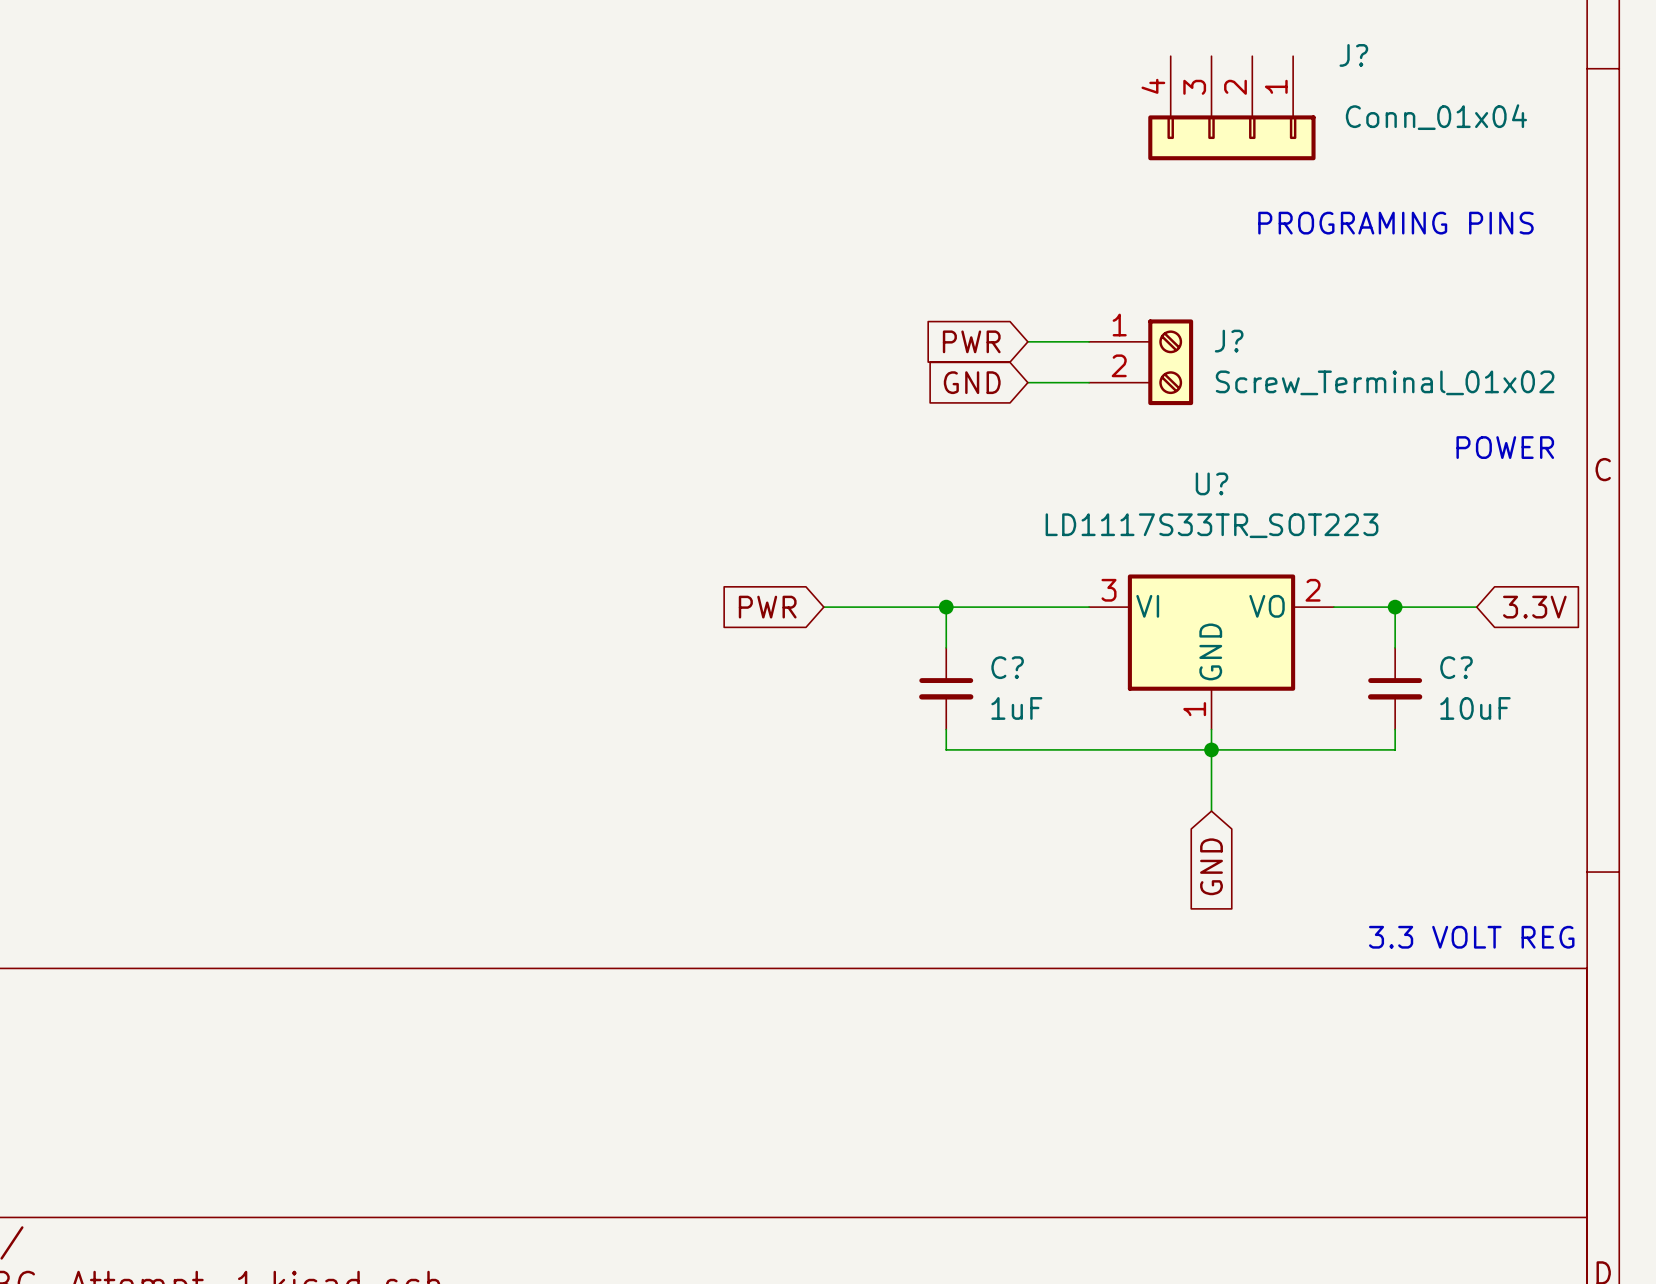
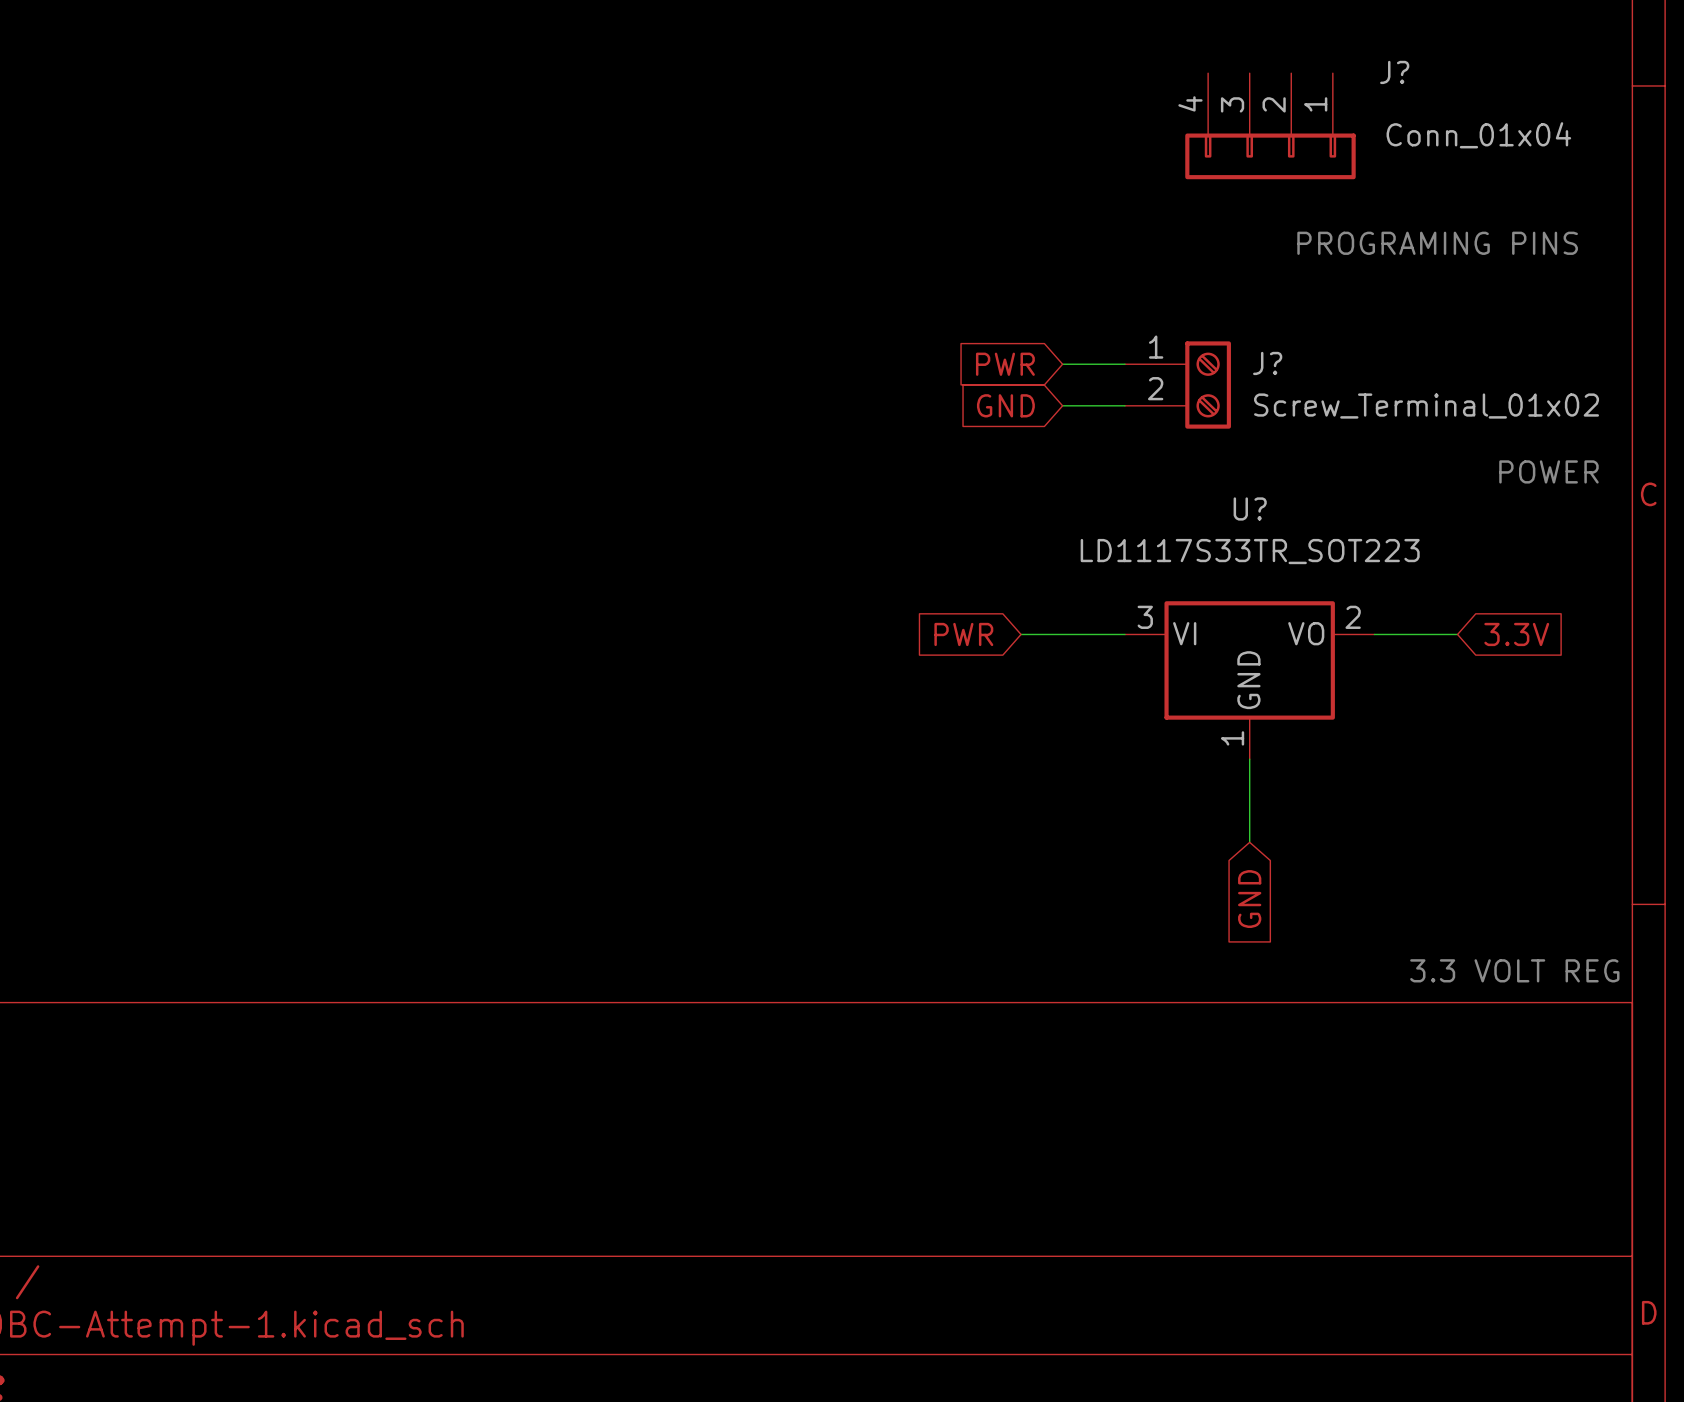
global label position: PWR (767, 607) -> PWR (963, 634)
wire: (823, 607) (987, 607) -> none
wire: (946, 607) (946, 647) -> none
junction: (946, 607) -> none
wire: (1395, 607) (1395, 647) -> none
junction: (1395, 607) -> none
wire: (1415, 607) (1476, 607) -> none
global label position: 3.3V (1534, 607) -> 3.3V (1516, 634)
C?: 1uF (946, 688) -> none
C?: 10uF (1395, 688) -> none
wire: (946, 729) (946, 749) (1395, 749) (1395, 729) -> none
junction: (1211, 749) -> none

